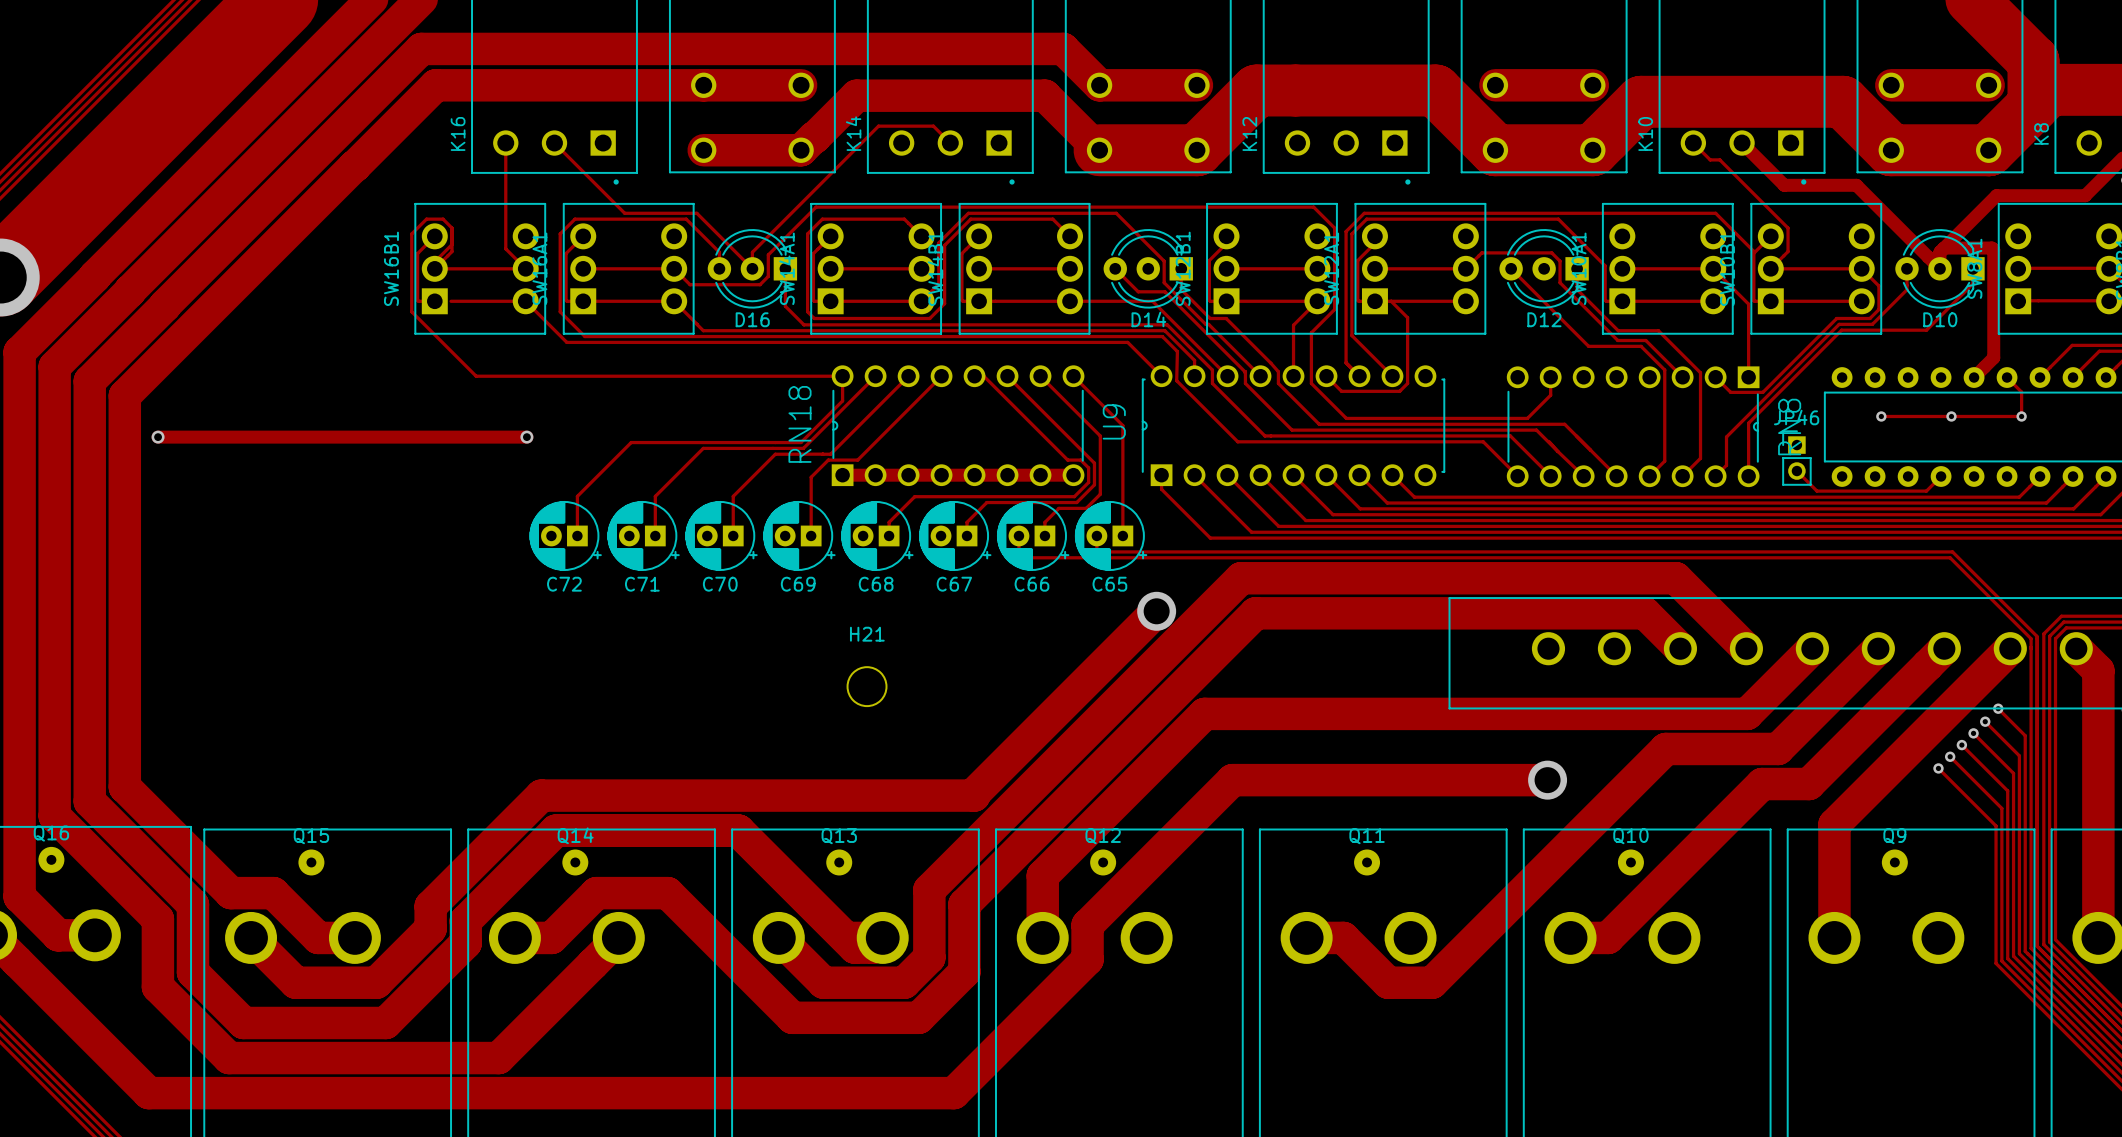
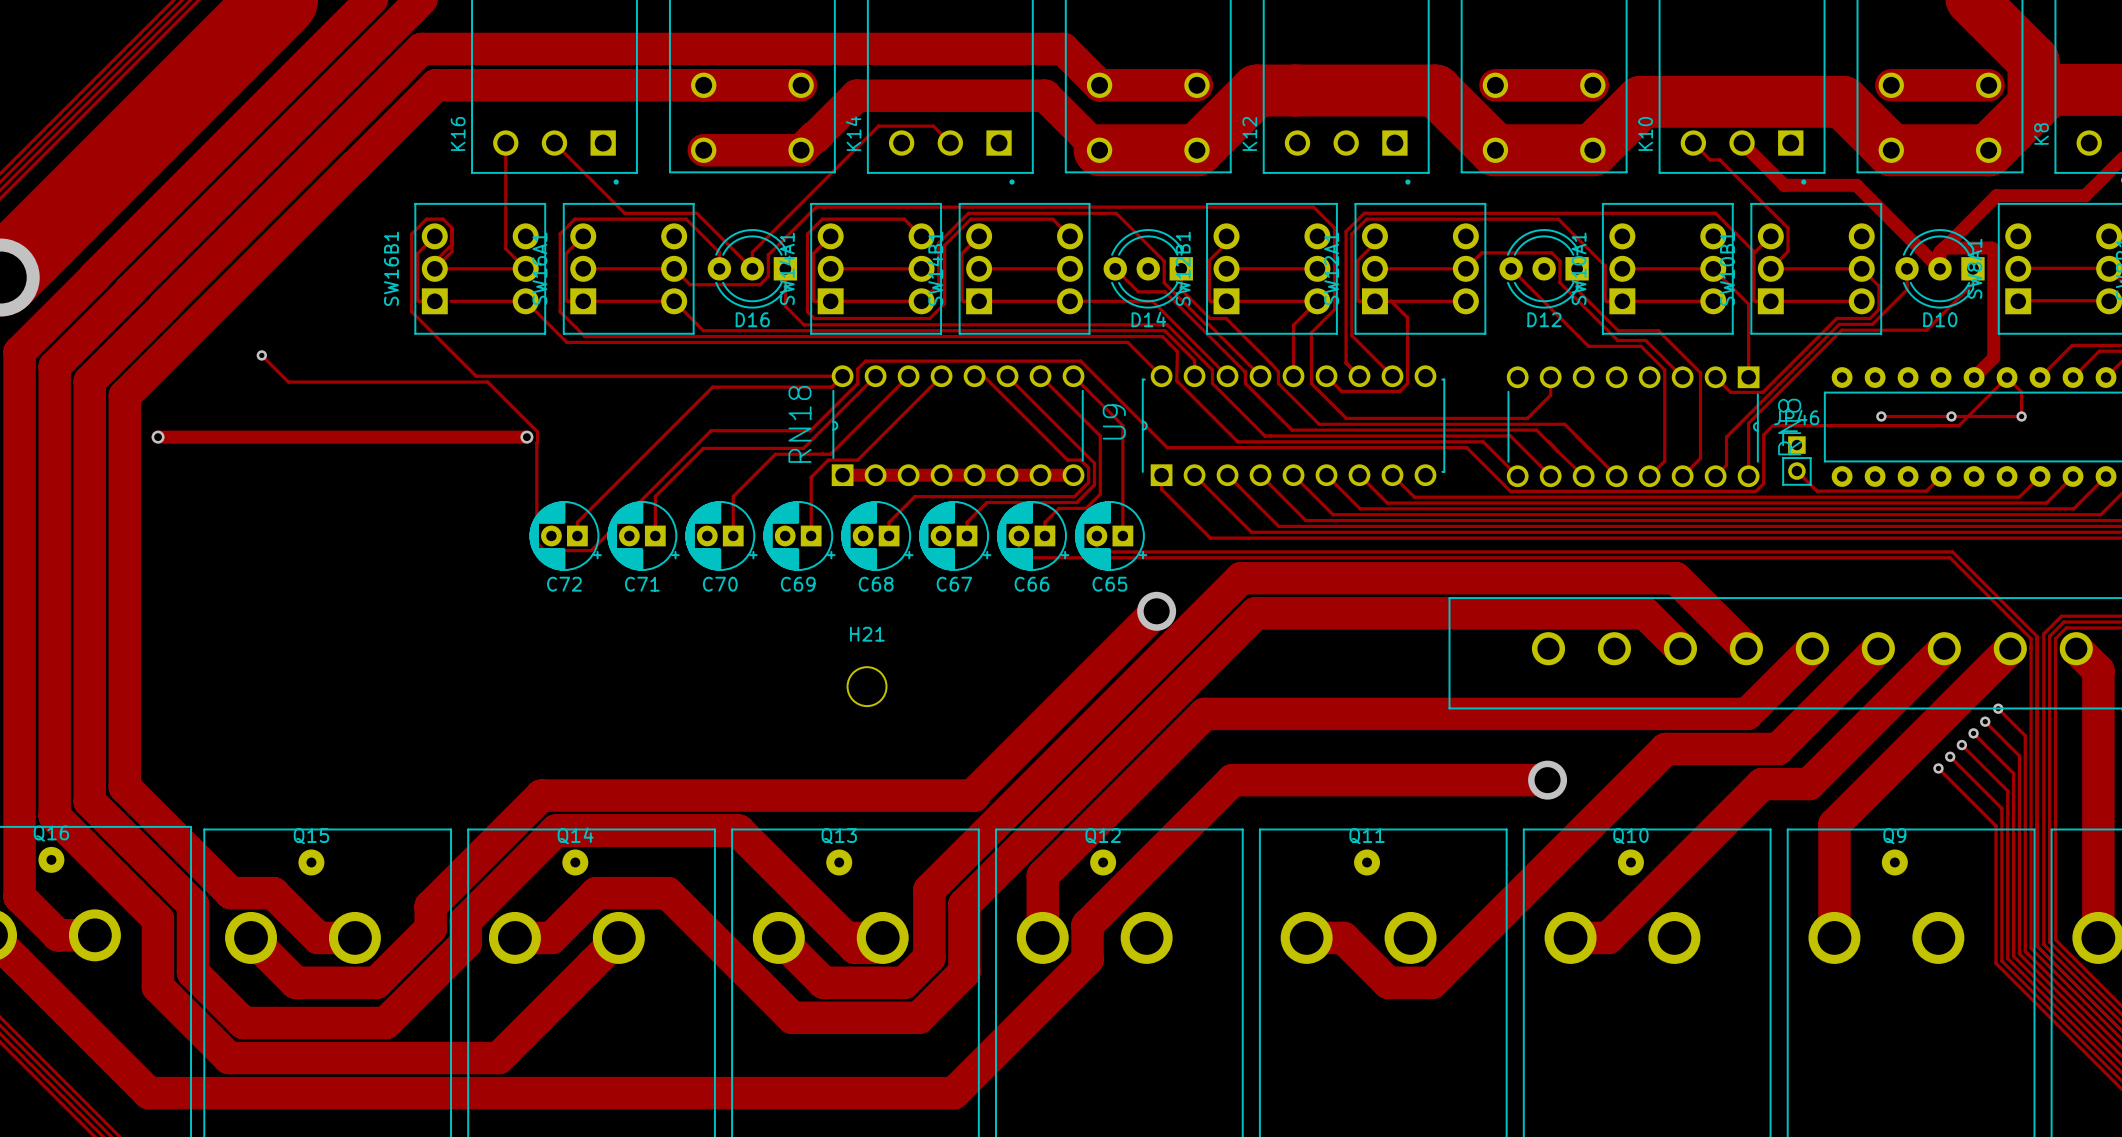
track: none -> (261, 355) (288, 382) (487, 382) (537, 431) (536, 542) (544, 550) (591, 550) (710, 430) (810, 430) (857, 383) (857, 368) (865, 361) (1080, 361) (1167, 447) (1466, 447) (1510, 491) (1755, 491) (1763, 483) (1763, 434) (1772, 425) (1959, 425) (2007, 377)
via: none -> (261, 355)
track: (842, 376) (842, 400) (801, 442) (631, 442) (577, 496) (577, 522) -> (842, 376) (831, 387) (712, 387) (577, 522)

